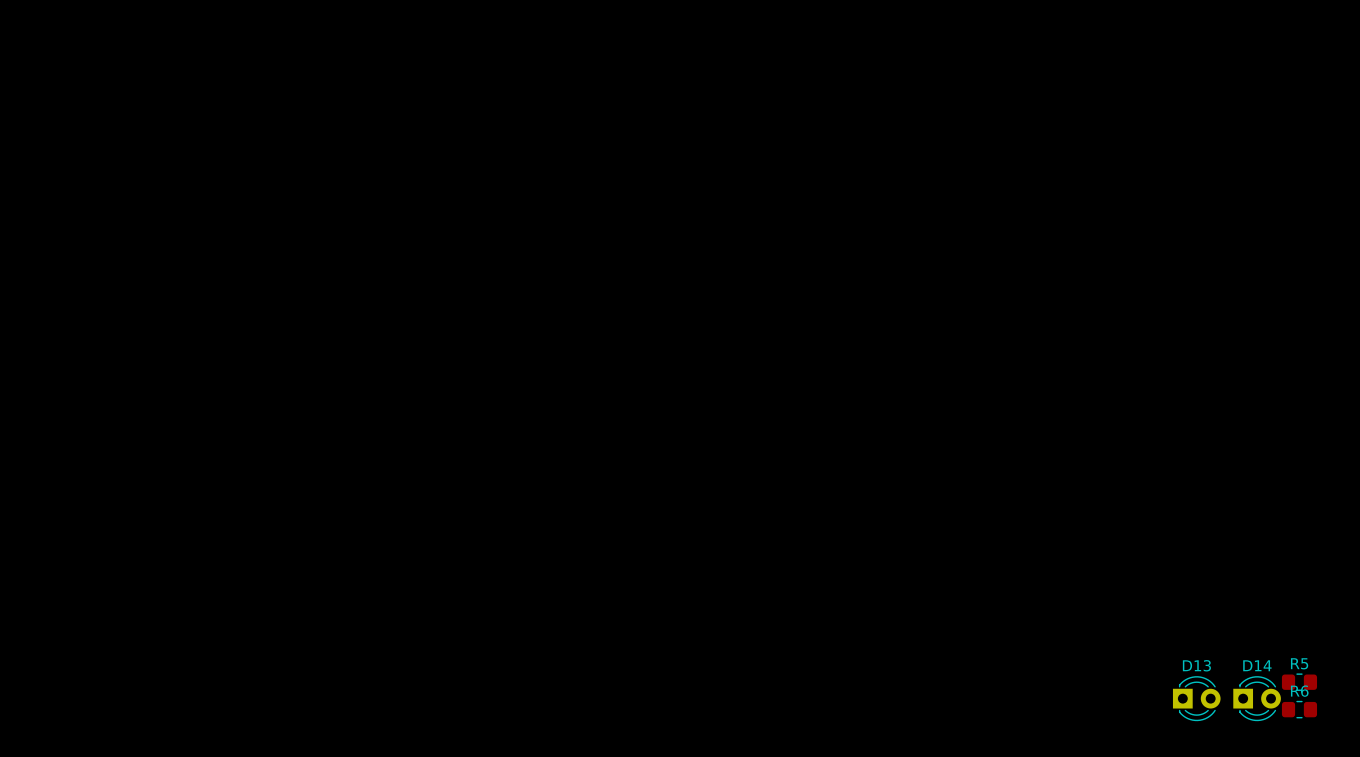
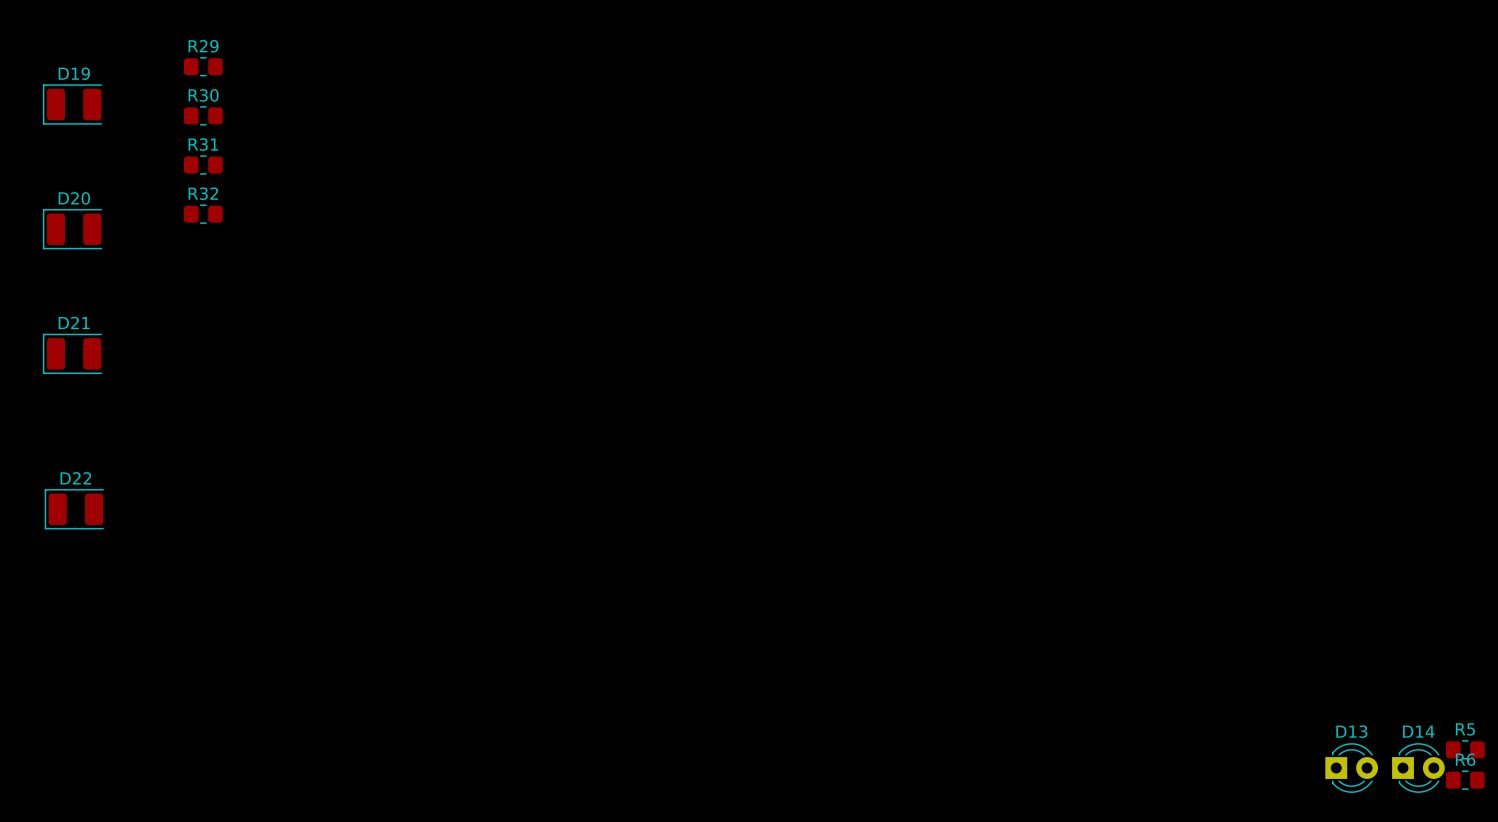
R29: none -> (203, 66)
D19: none -> (72, 104)
R30: none -> (203, 115)
R31: none -> (203, 165)
R32: none -> (203, 214)
D20: none -> (72, 229)
D21: none -> (72, 353)
D22: none -> (74, 509)

